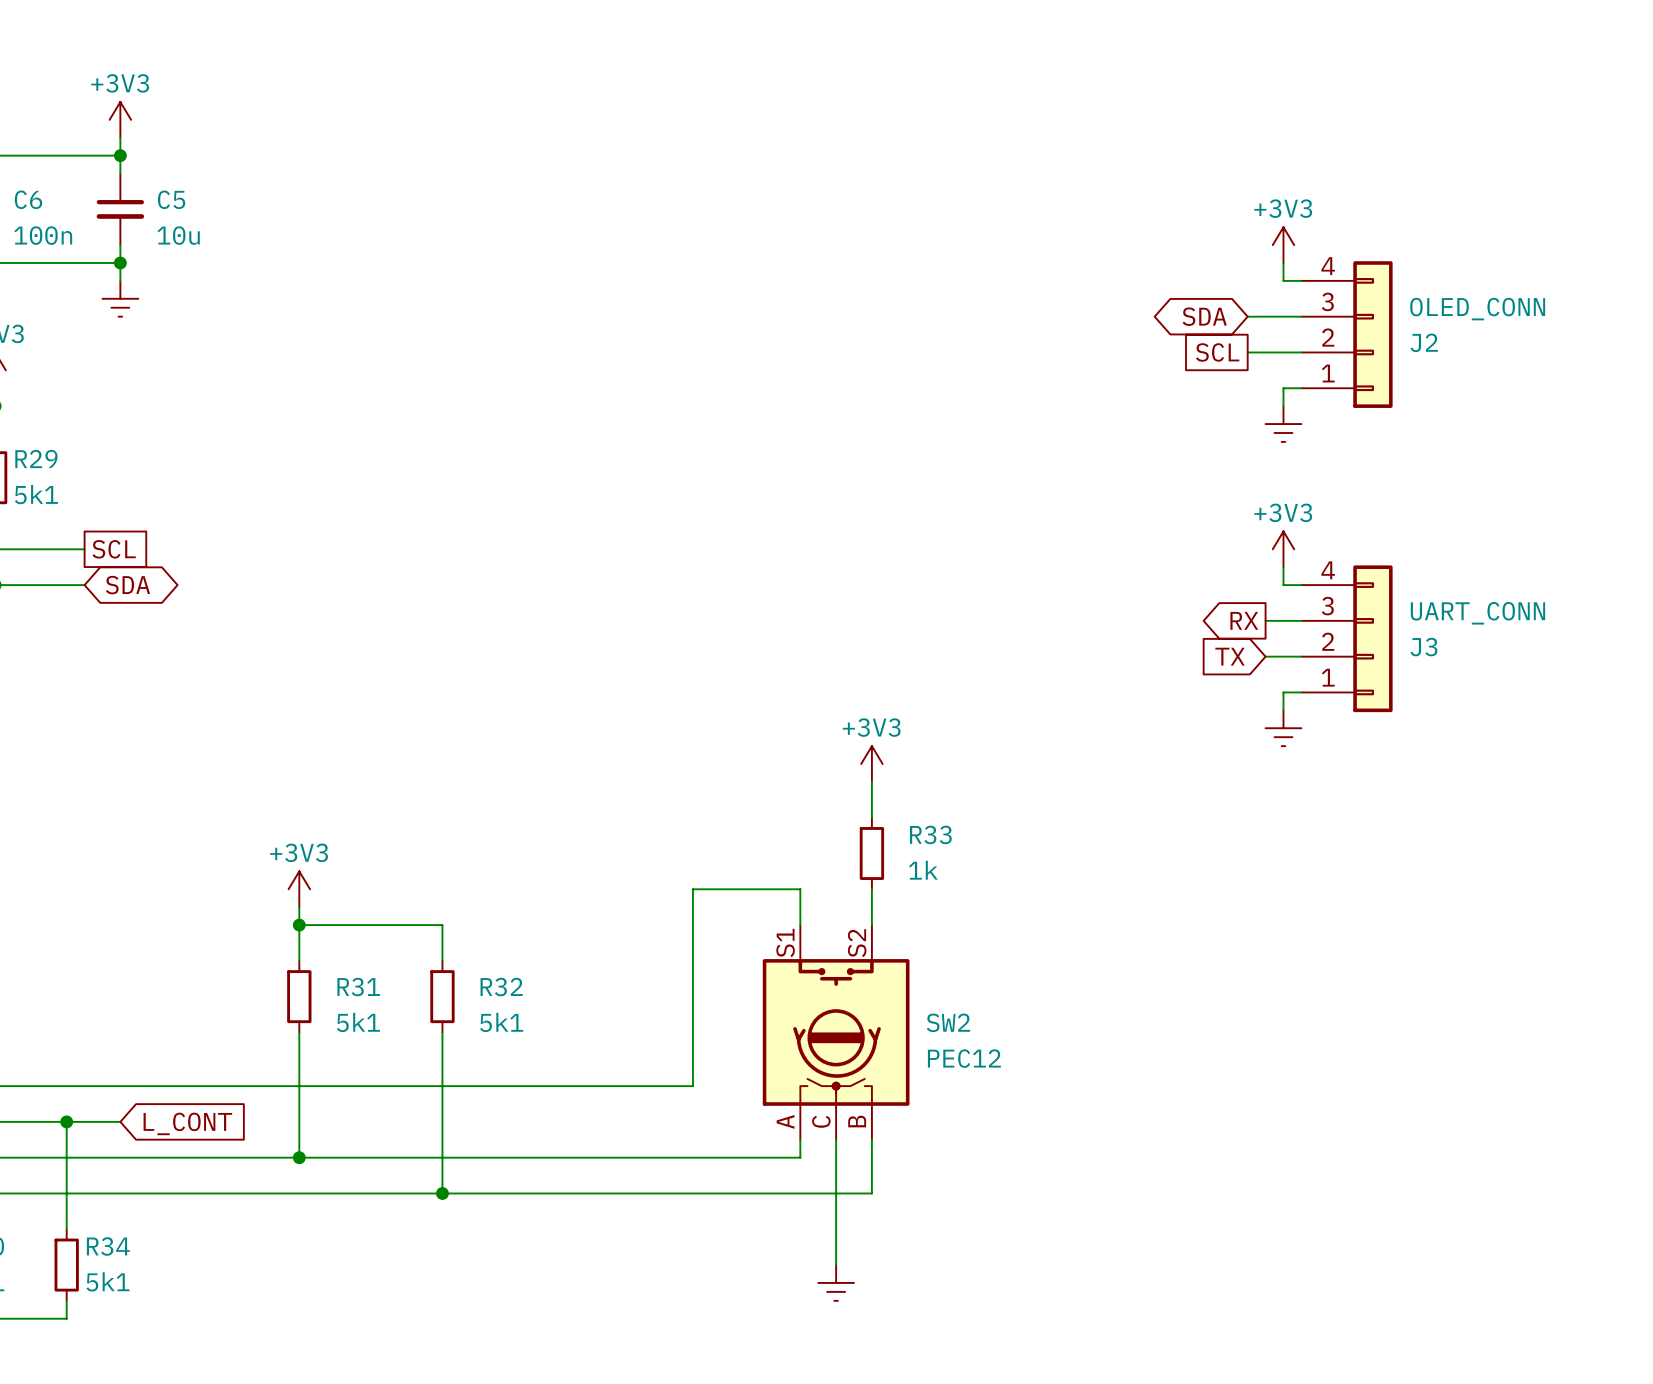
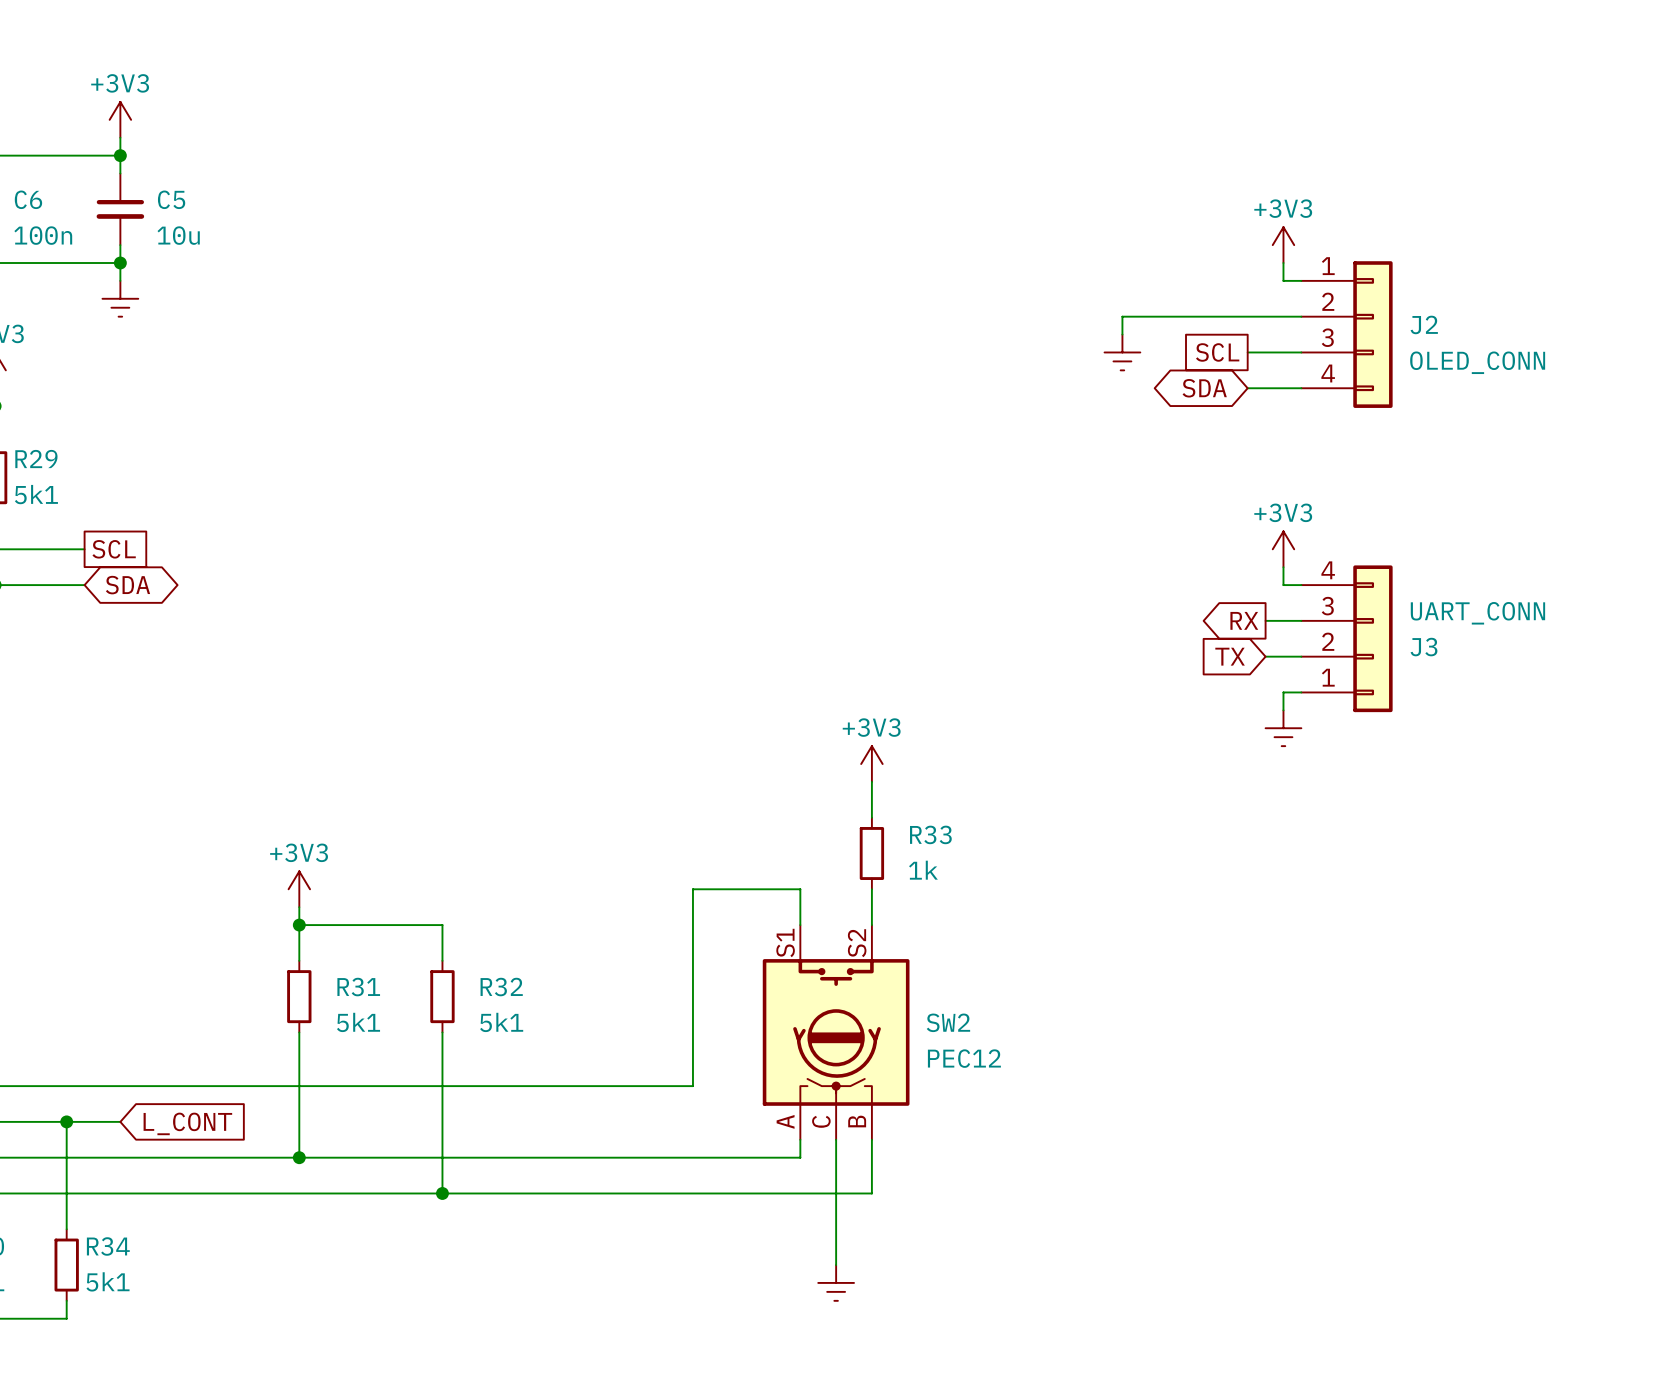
global label position: SDA (1204, 316) -> SDA (1204, 388)
wire: none -> (1247, 316) (1122, 316) (1122, 334)
J2 flip: as is (1372, 334) -> up-down (1372, 334)
wire: (1283, 388) (1283, 406) -> (1283, 388) (1247, 388)
power symbol position: (1283, 424) -> (1122, 352)

